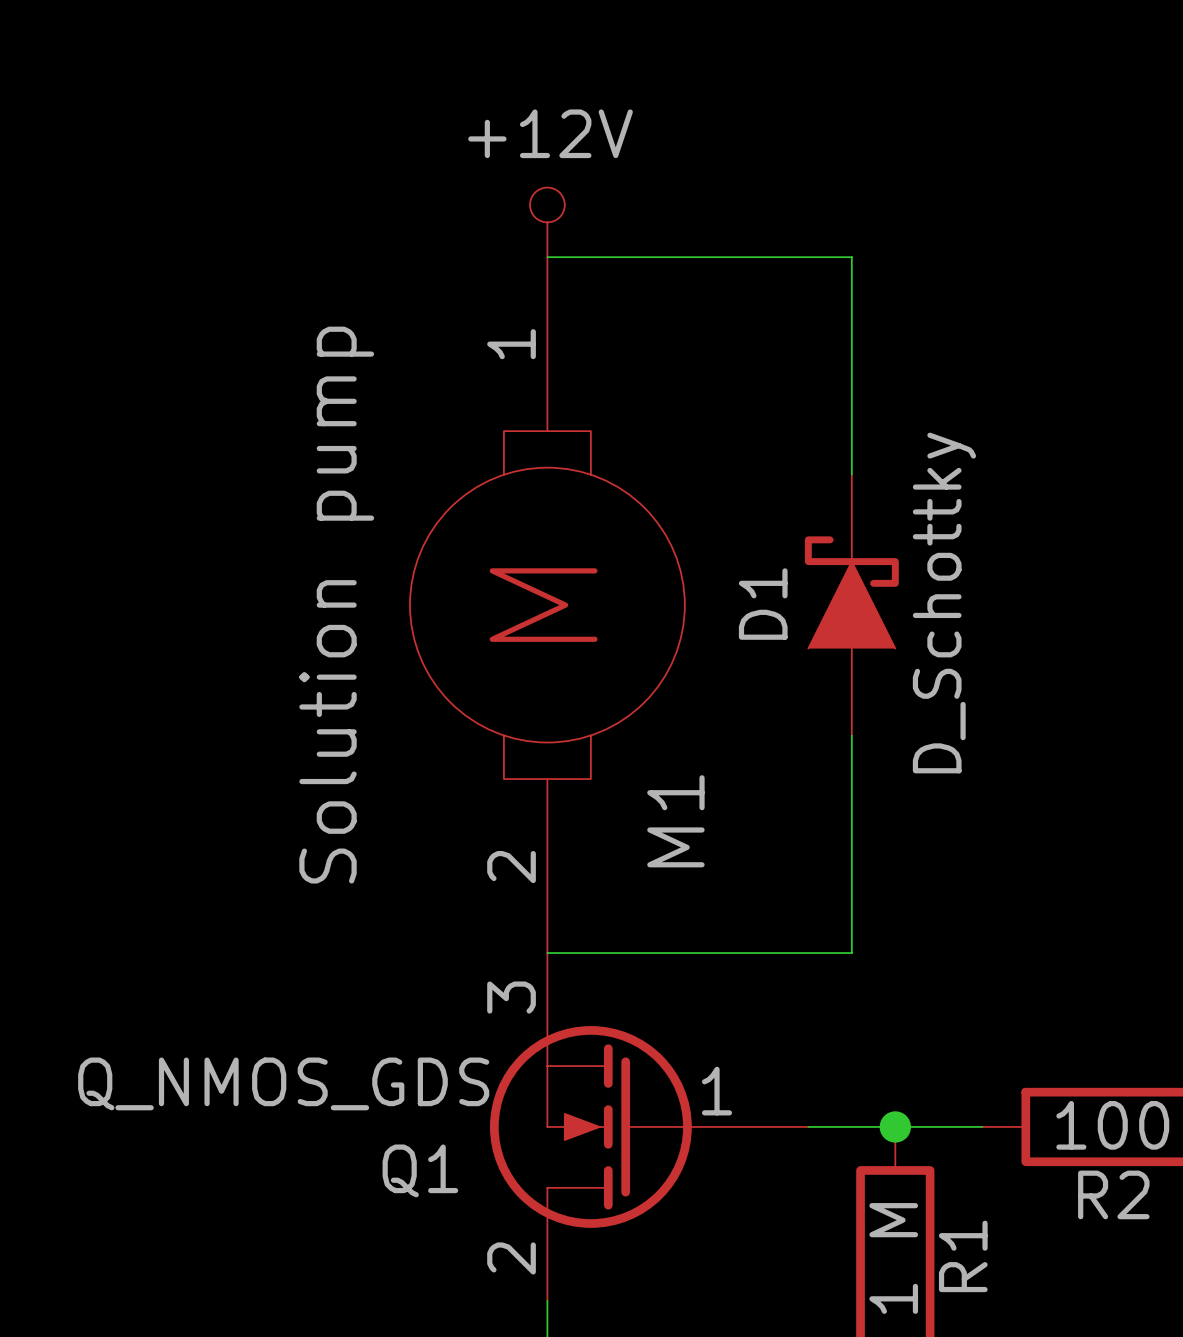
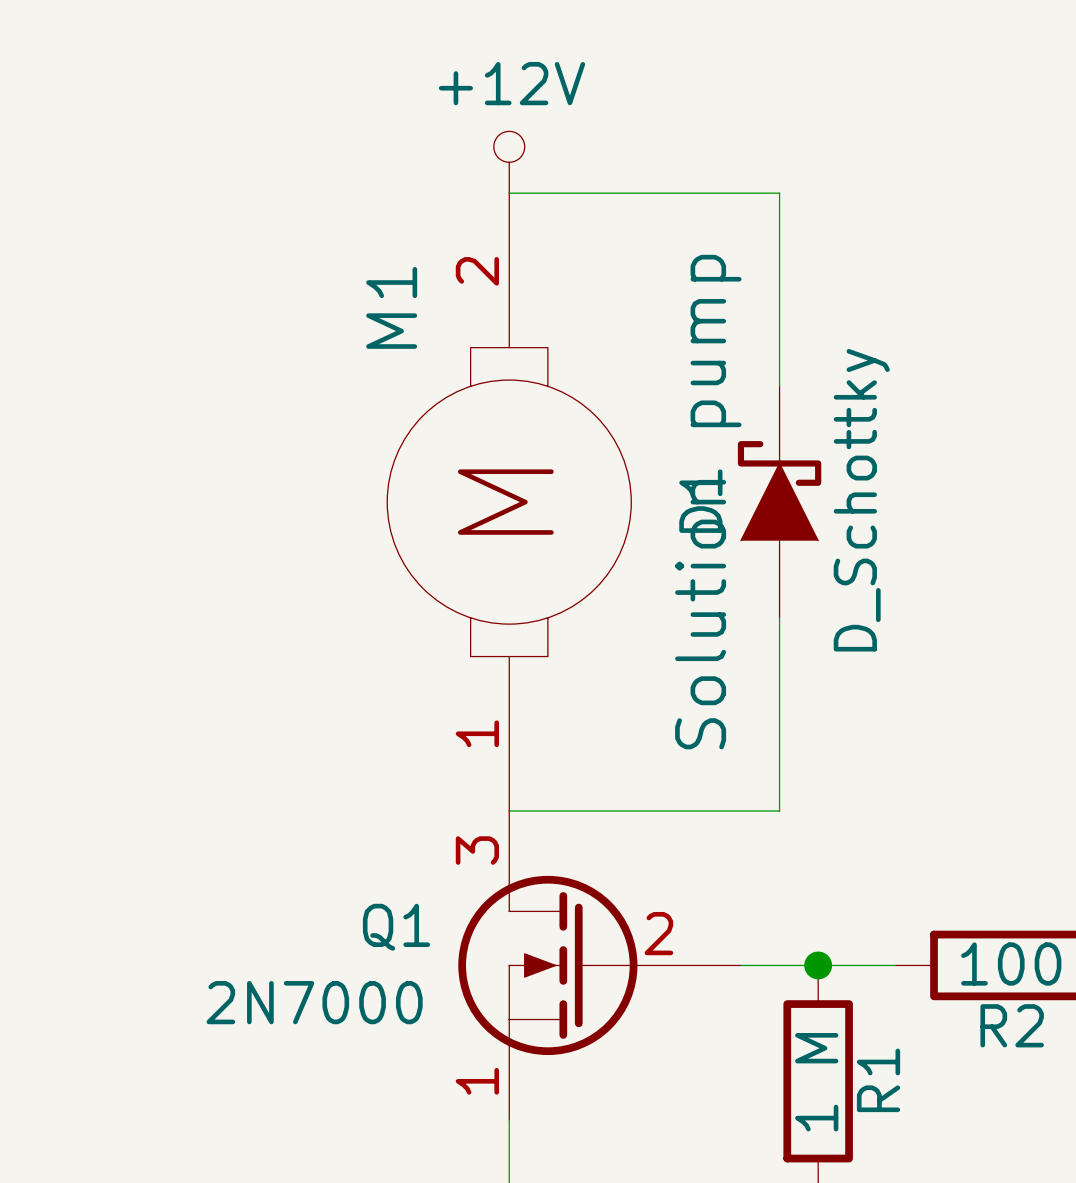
M1 rotation: 0° (547, 605) -> 180° (509, 502)
Q1 symbol: [490, 953, 809, 1301] -> [458, 811, 741, 1120]
Q1 value: Q_NMOS_GDS (283, 1083) -> 2N7000 (314, 1002)
Q1 name position: Q1 (420, 1170) -> Q1 (396, 927)

